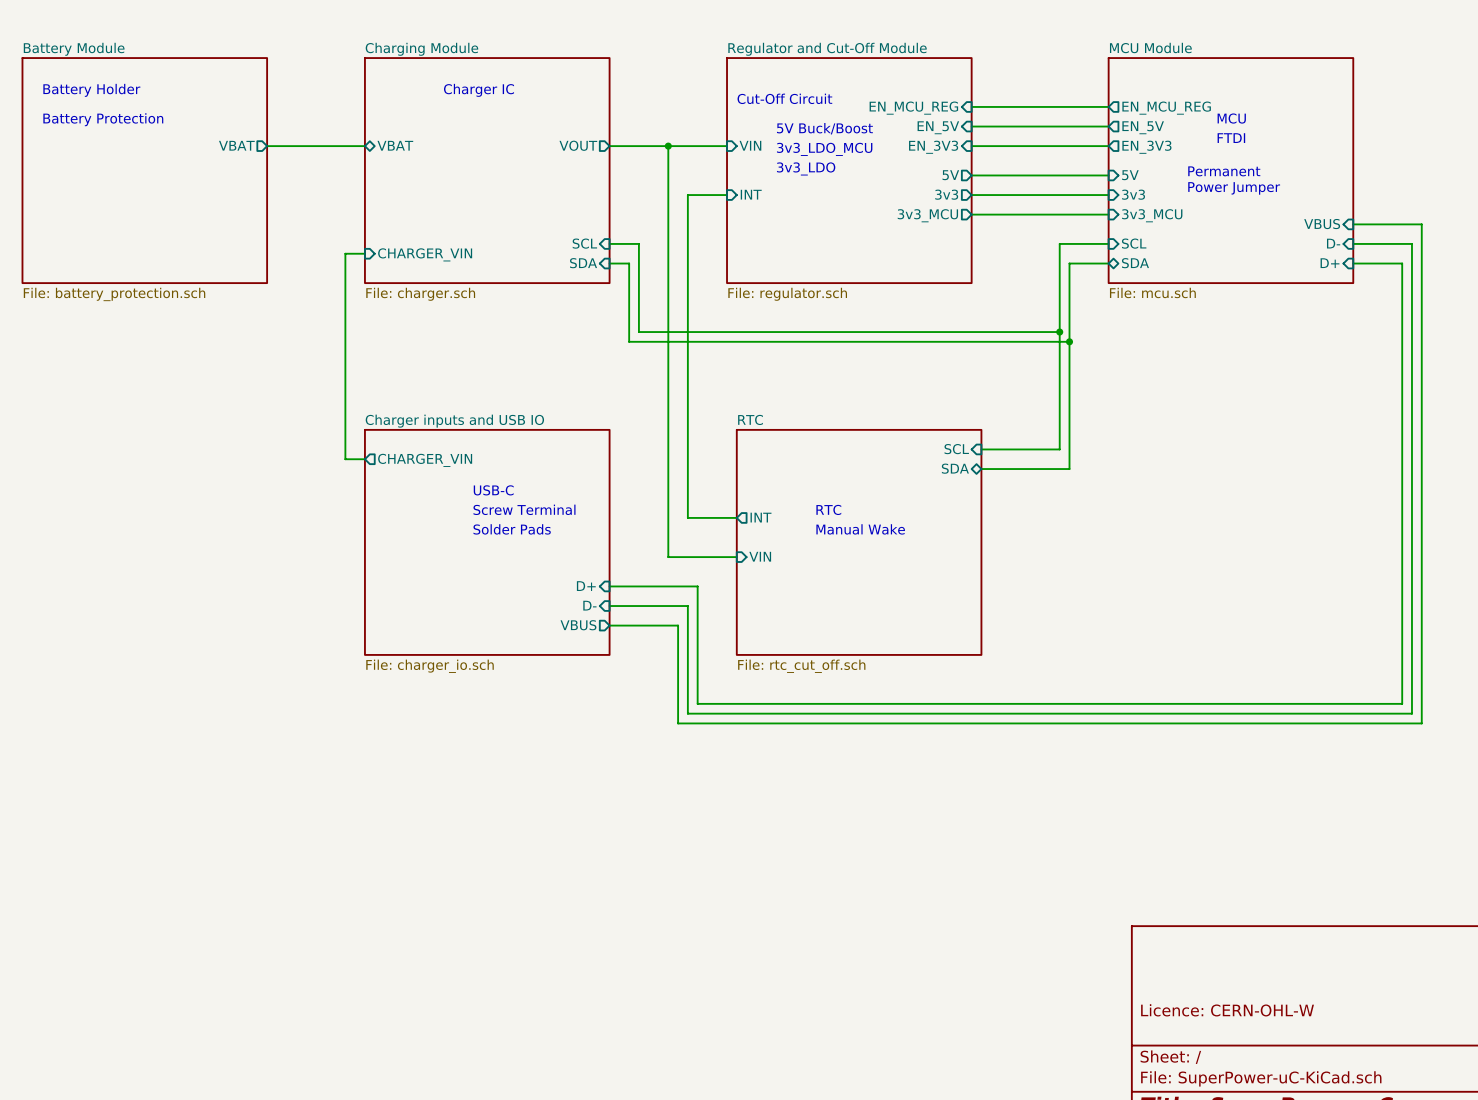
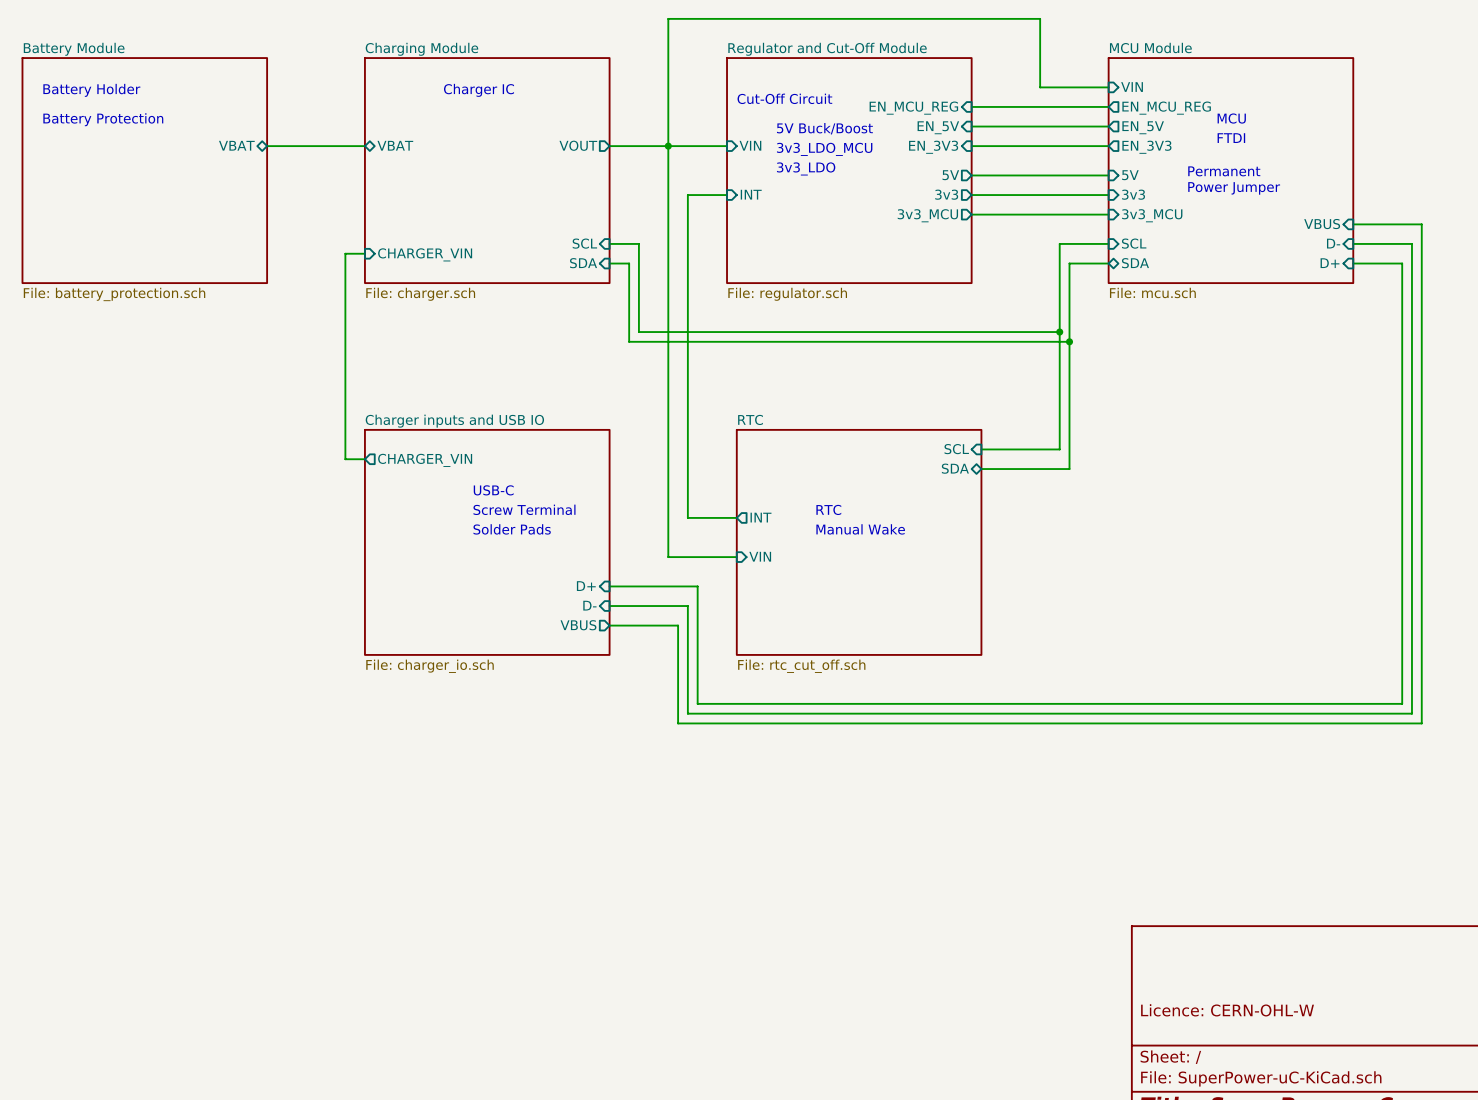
wire: none -> (1108, 87) (1040, 87) (1040, 18) (668, 18) (668, 146)
sheet pin: none -> VIN (1132, 87)
sheet pin shape: output (236, 145) -> bidirectional (236, 145)

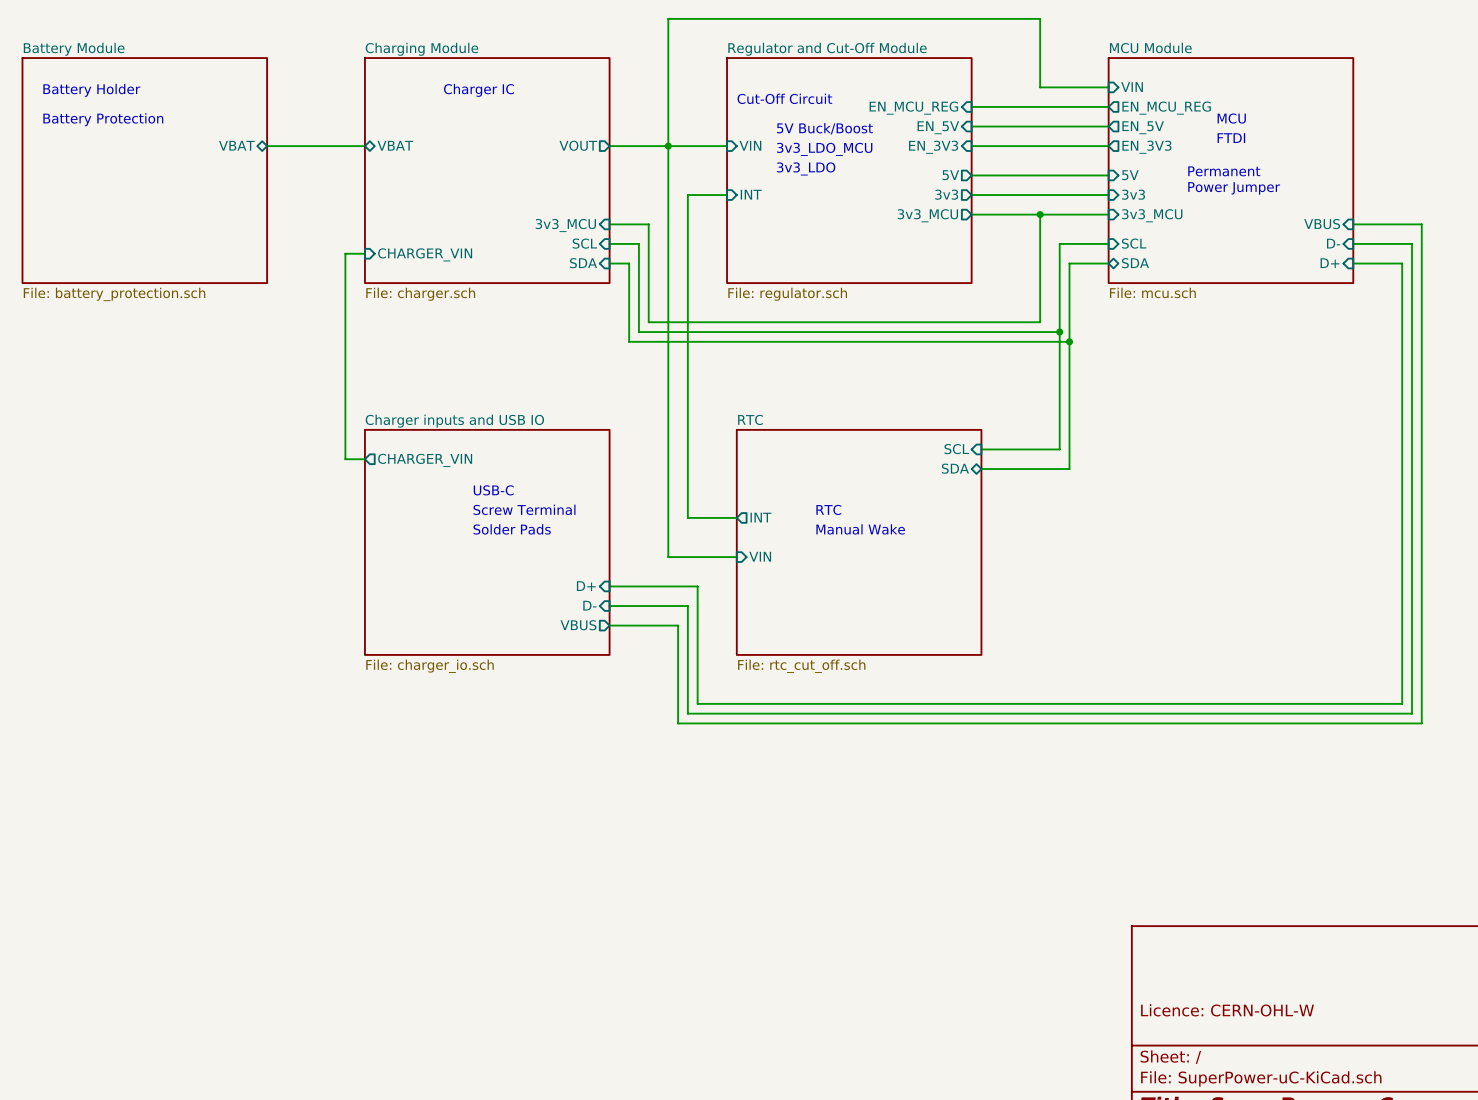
wire: none -> (1040, 214) (1040, 322) (648, 322) (648, 224) (609, 224)
junction: none -> (1040, 214)
sheet pin: none -> 3v3_MCU (565, 225)

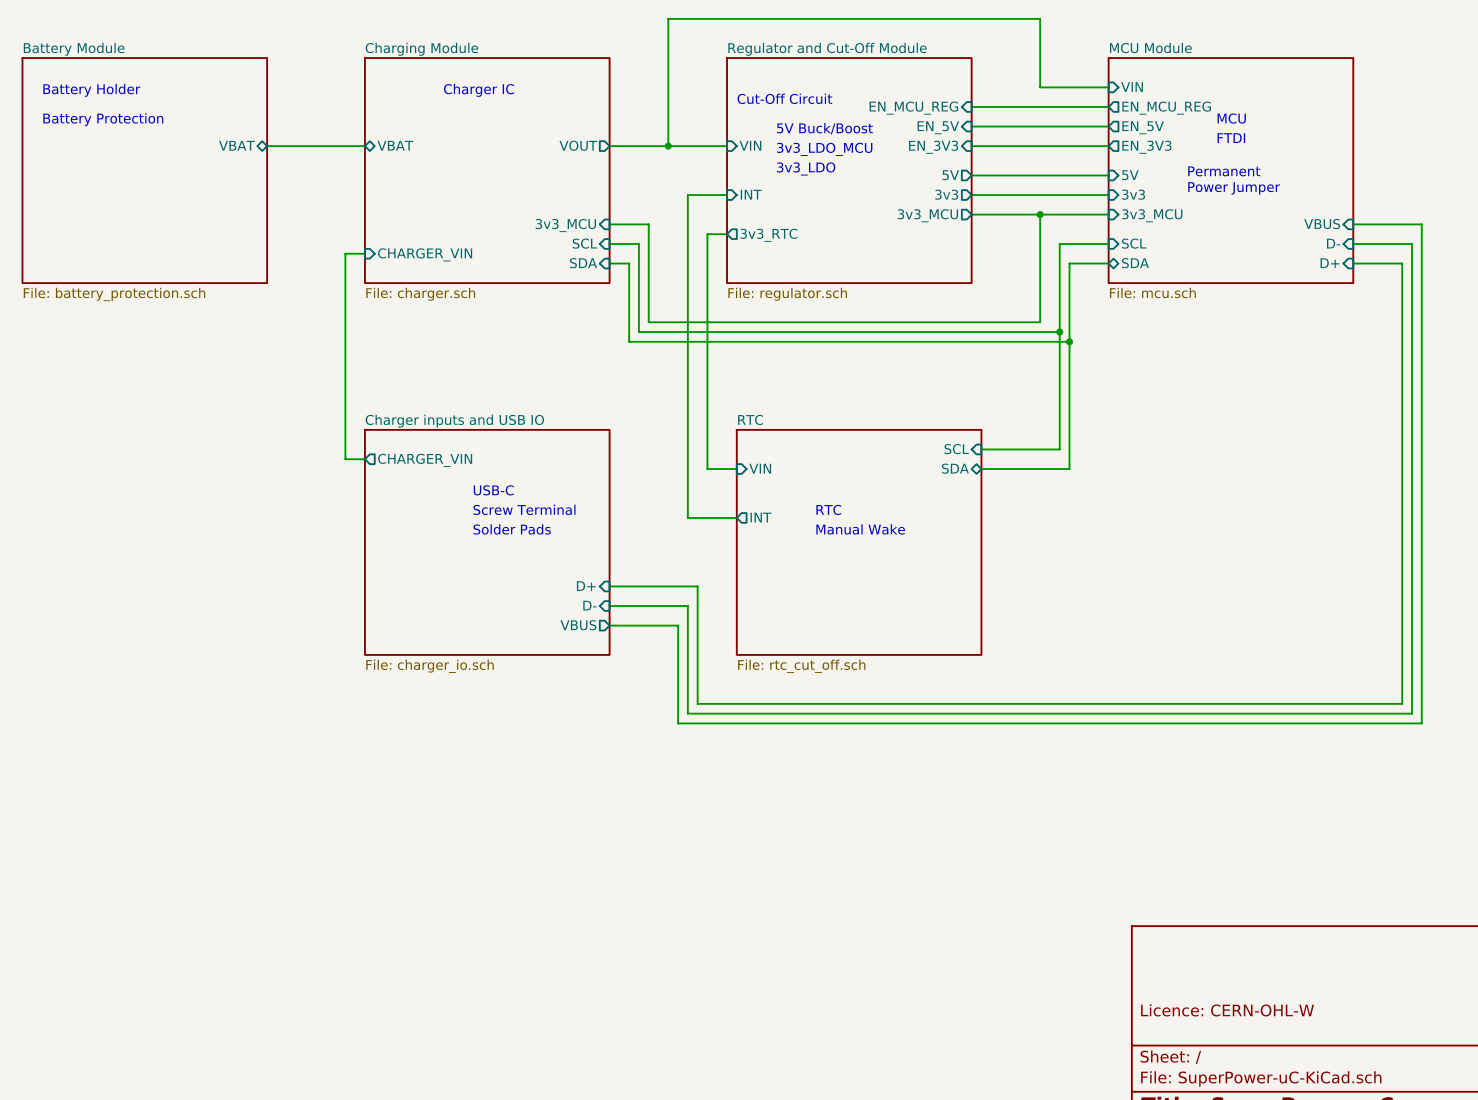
wire: (668, 146) (668, 557) (736, 557) -> none
wire: none -> (727, 234) (707, 234) (707, 469) (736, 469)
sheet pin: none -> 3v3_RTC (768, 235)
sheet pin position: VIN (760, 556) -> VIN (760, 468)

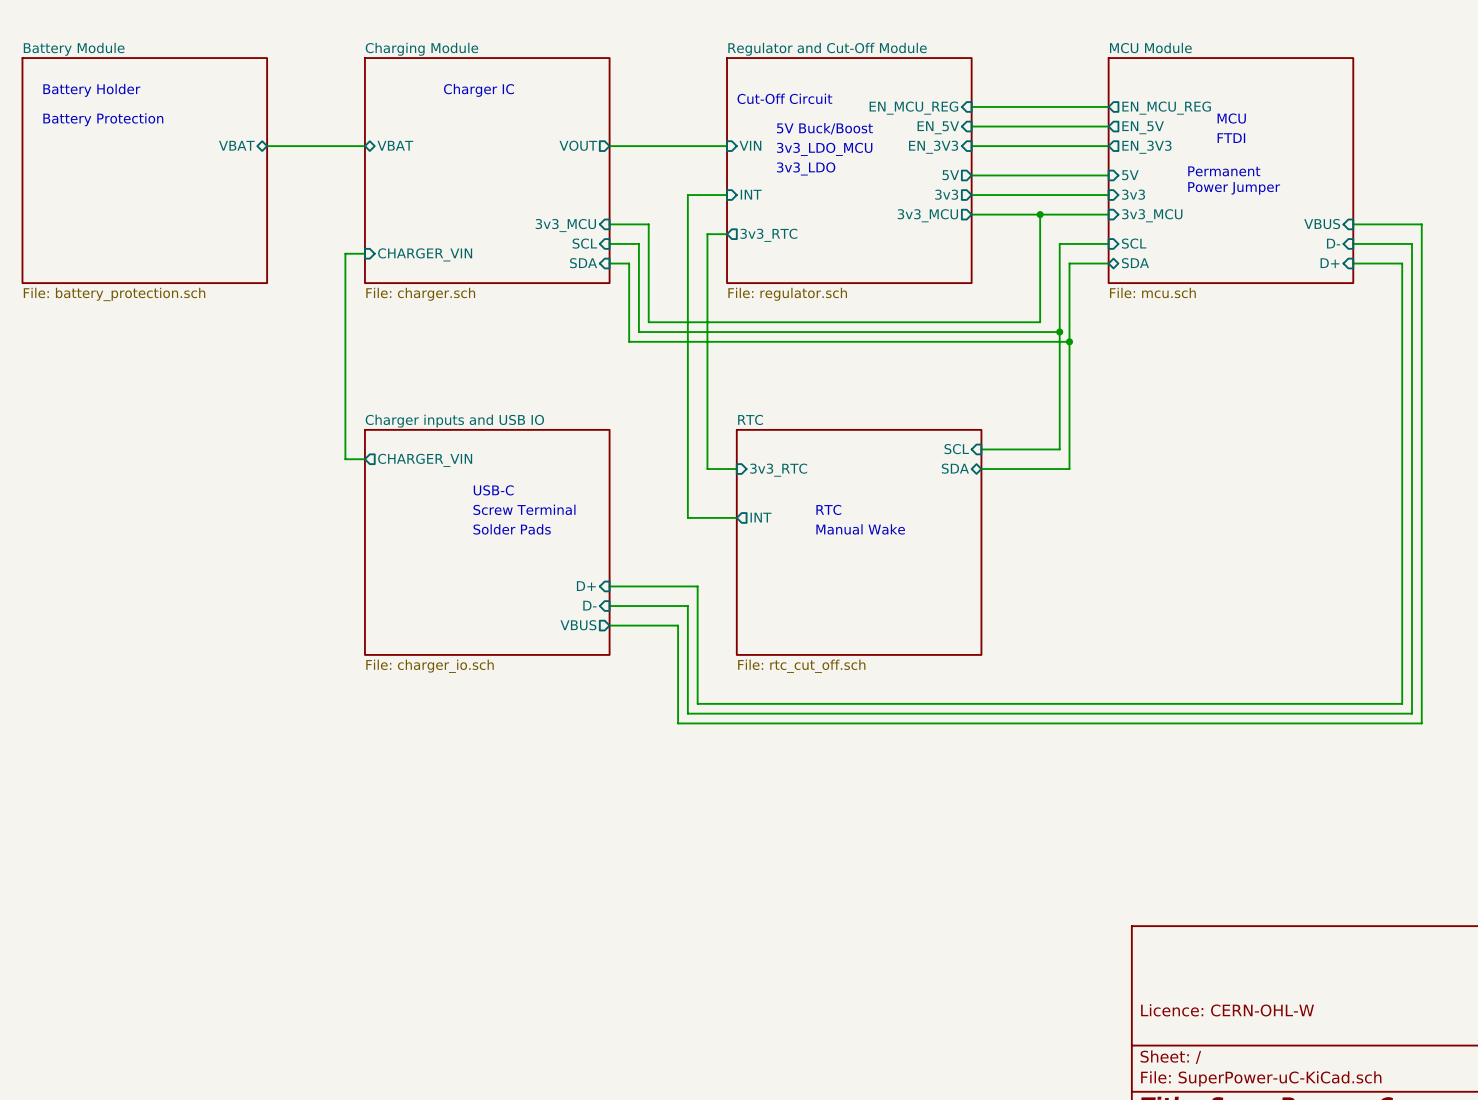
wire: (1108, 87) (1040, 87) (1040, 18) (668, 18) (668, 146) -> none
sheet pin: VIN (1132, 87) -> none
junction: (668, 146) -> none
sheet pin: VIN (760, 468) -> 3v3_RTC (778, 470)

